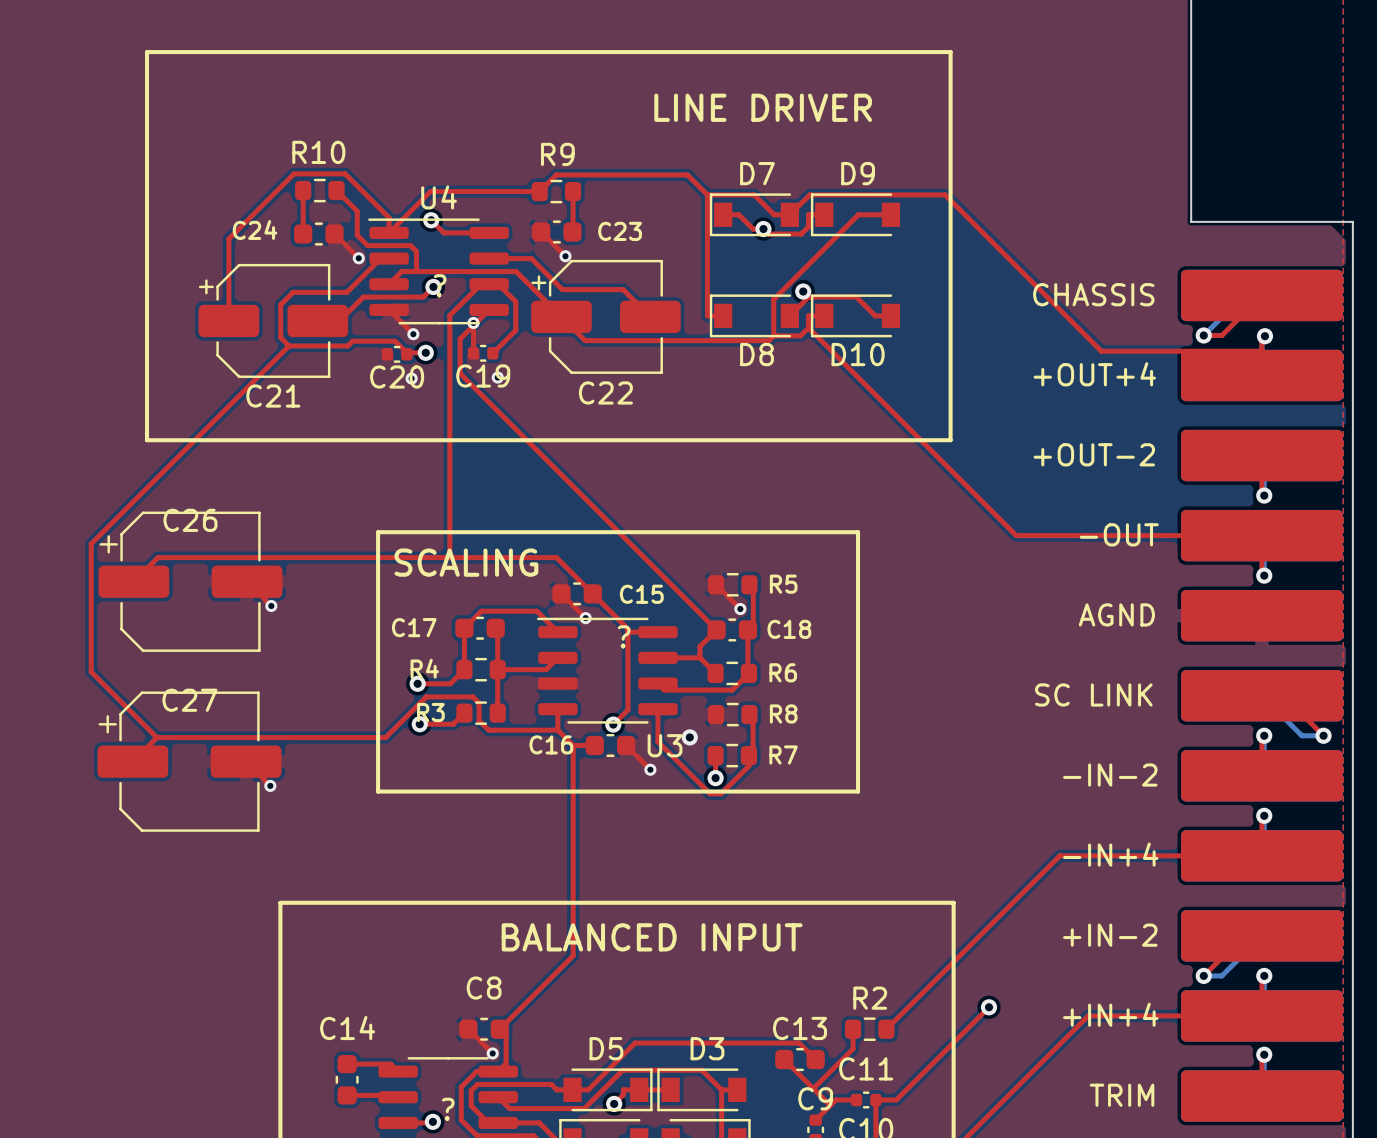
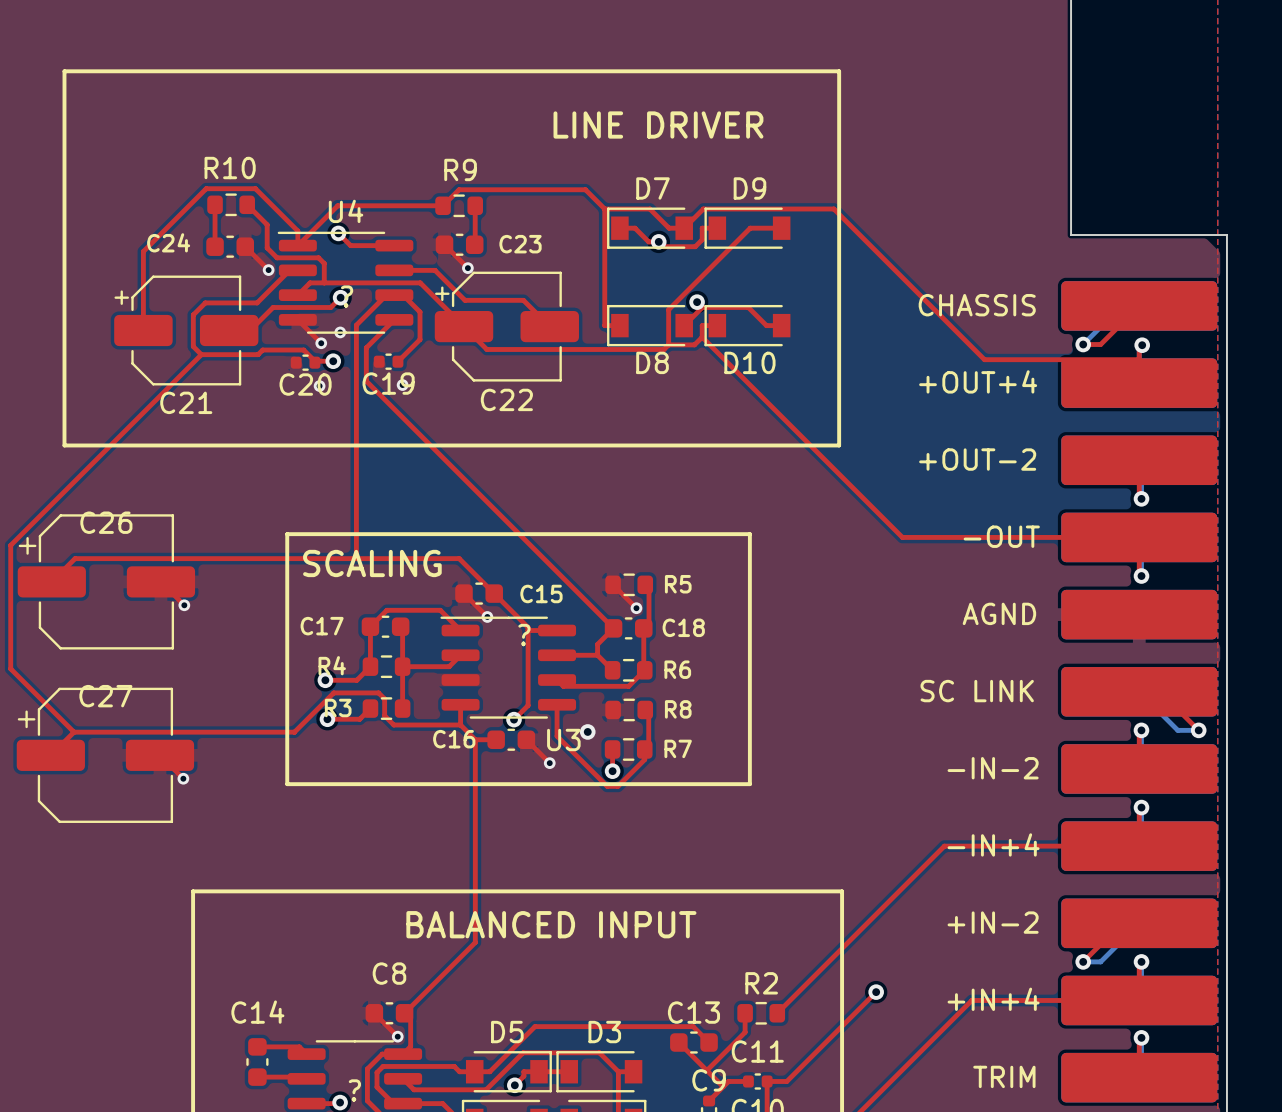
top track: (473, 322) (473, 353) -> none
via position: (473, 322) -> (340, 332)

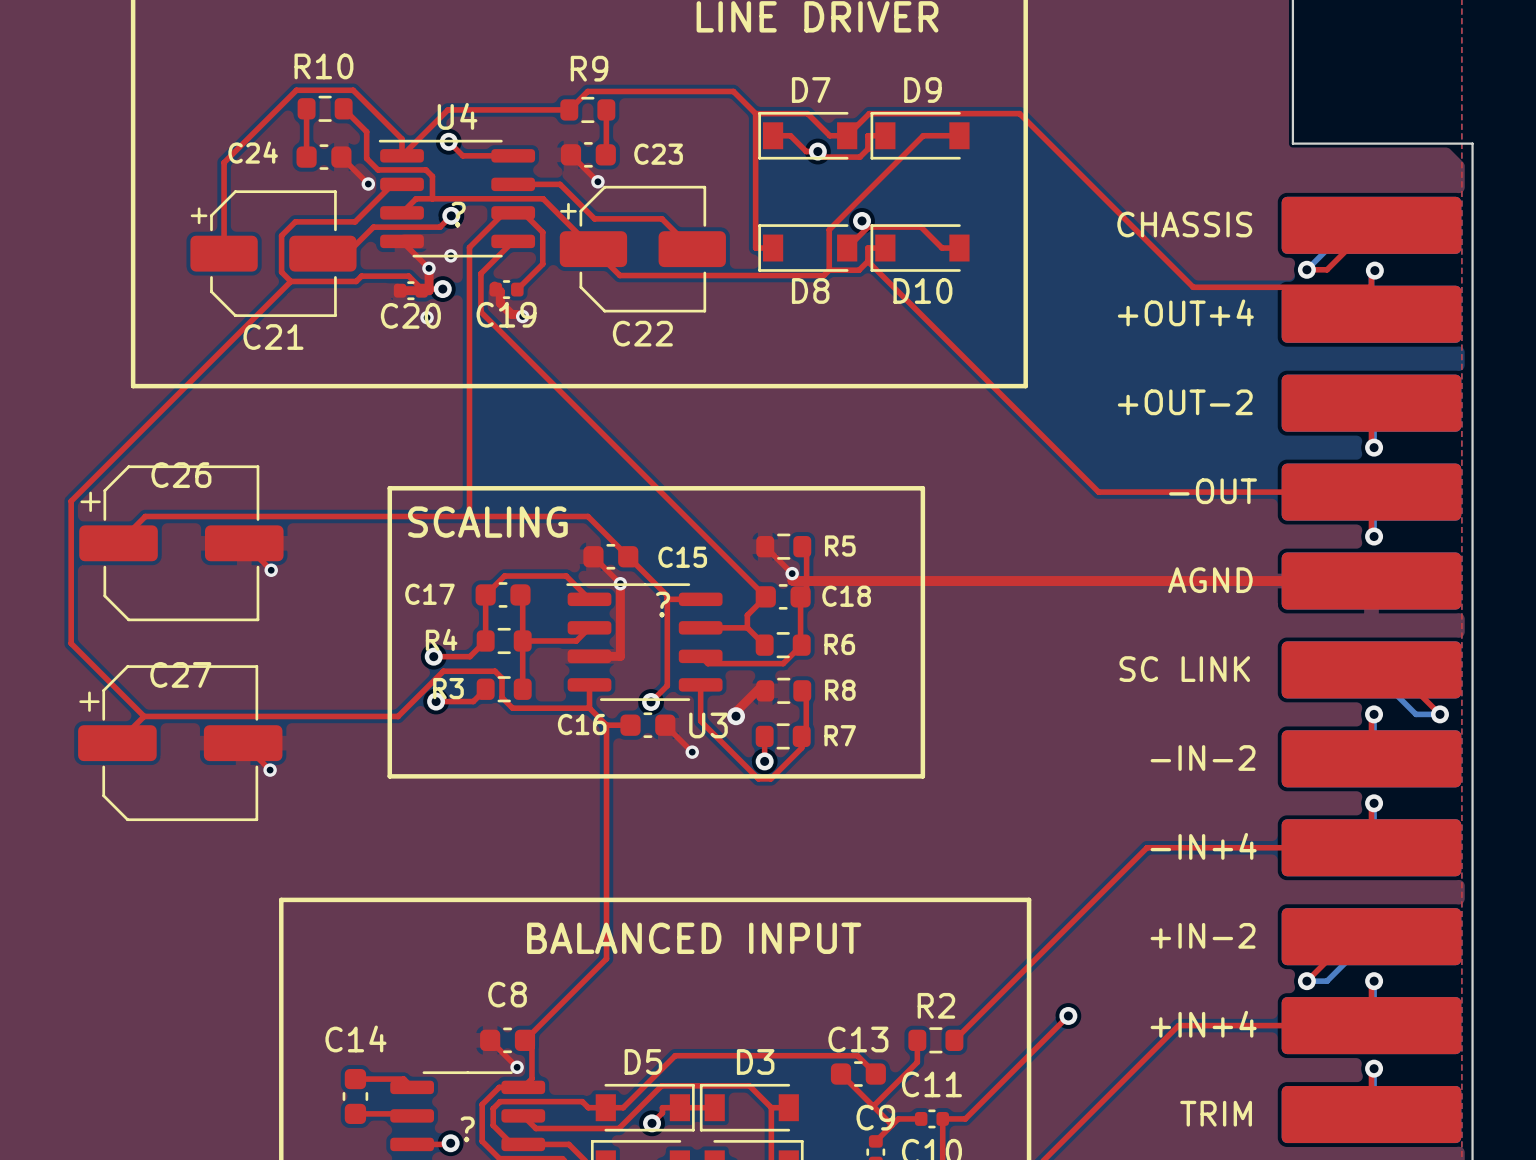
top track: none -> (429, 268) (429, 290) (400, 290)
top track: none -> (494, 285) (500, 291) (500, 303) (511, 314) (517, 314)
top track: none -> (792, 573) (792, 581) (1371, 581)
top track: none -> (620, 583) (620, 656) (589, 656)
top track: none -> (762, 685) (734, 713)

